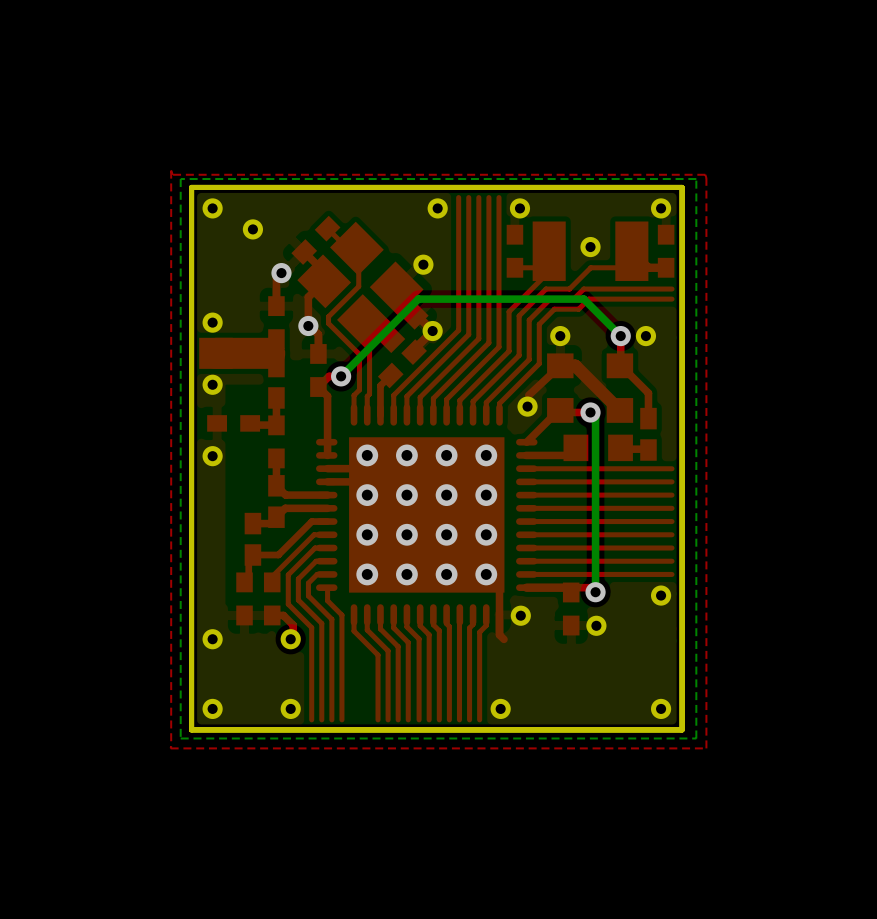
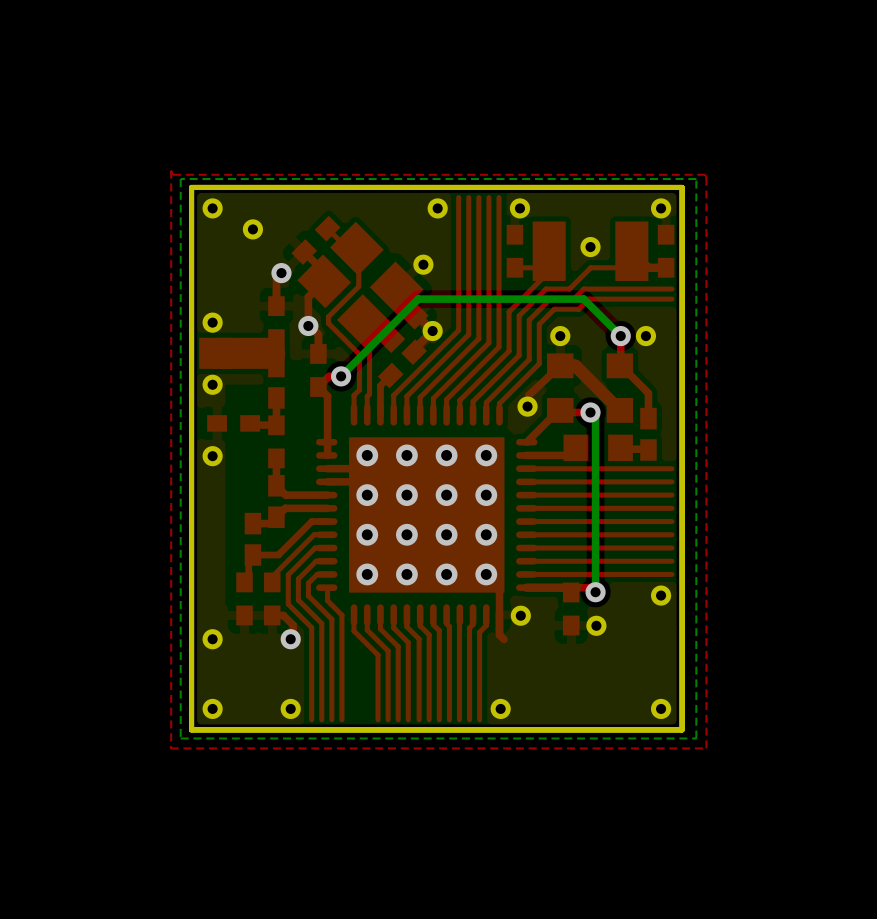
part: (290, 639) -> none
via: none -> (290, 639)

